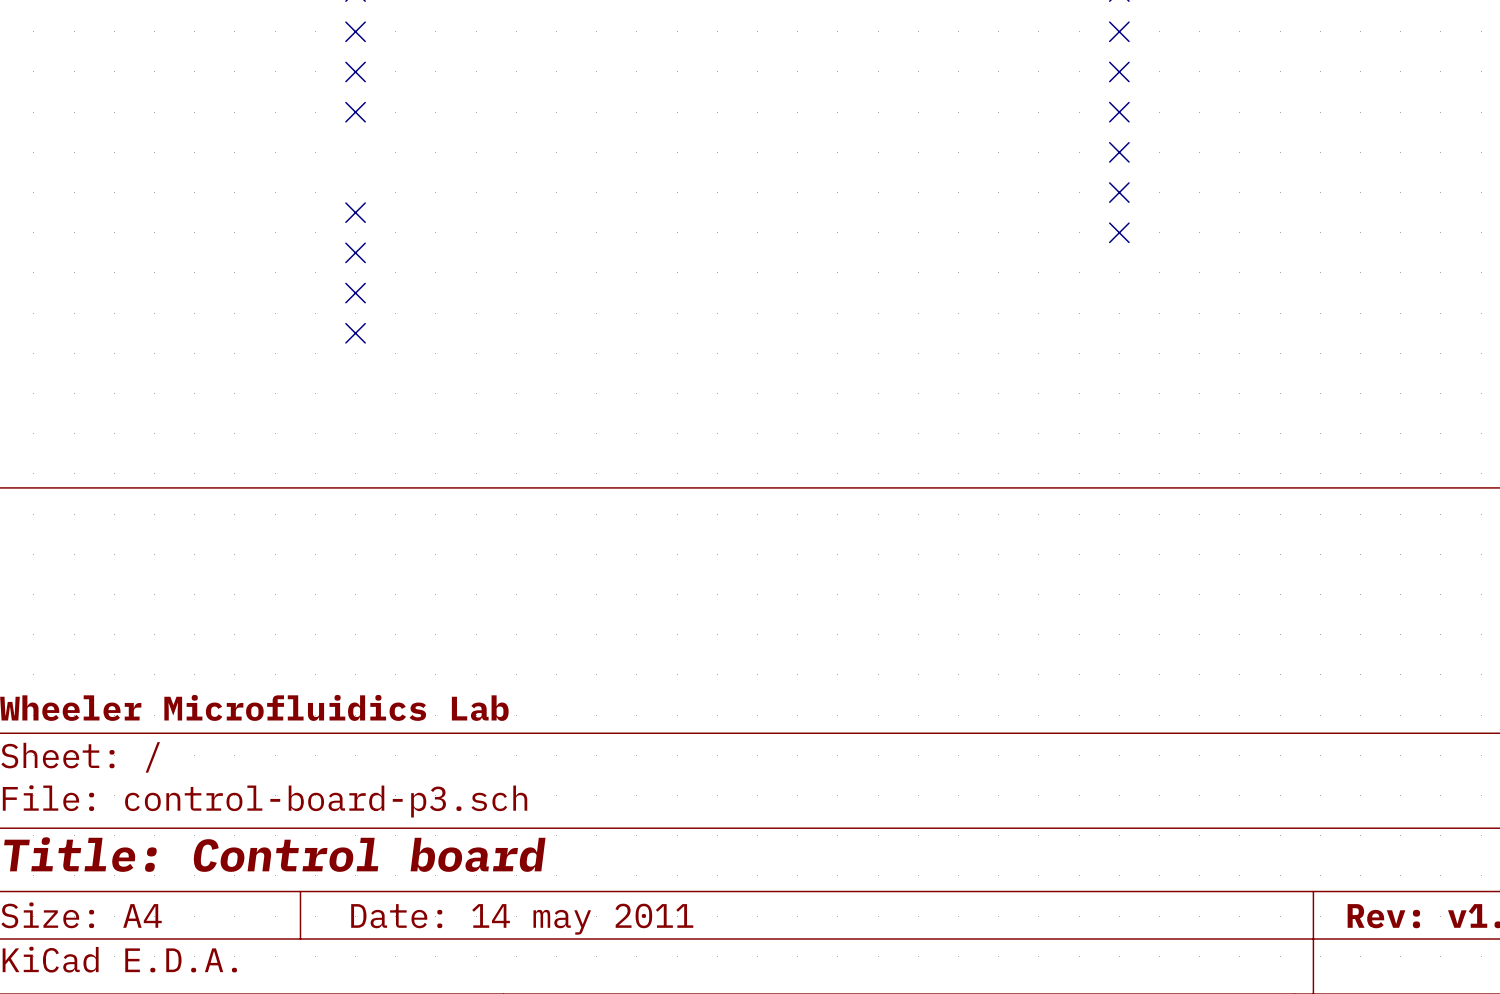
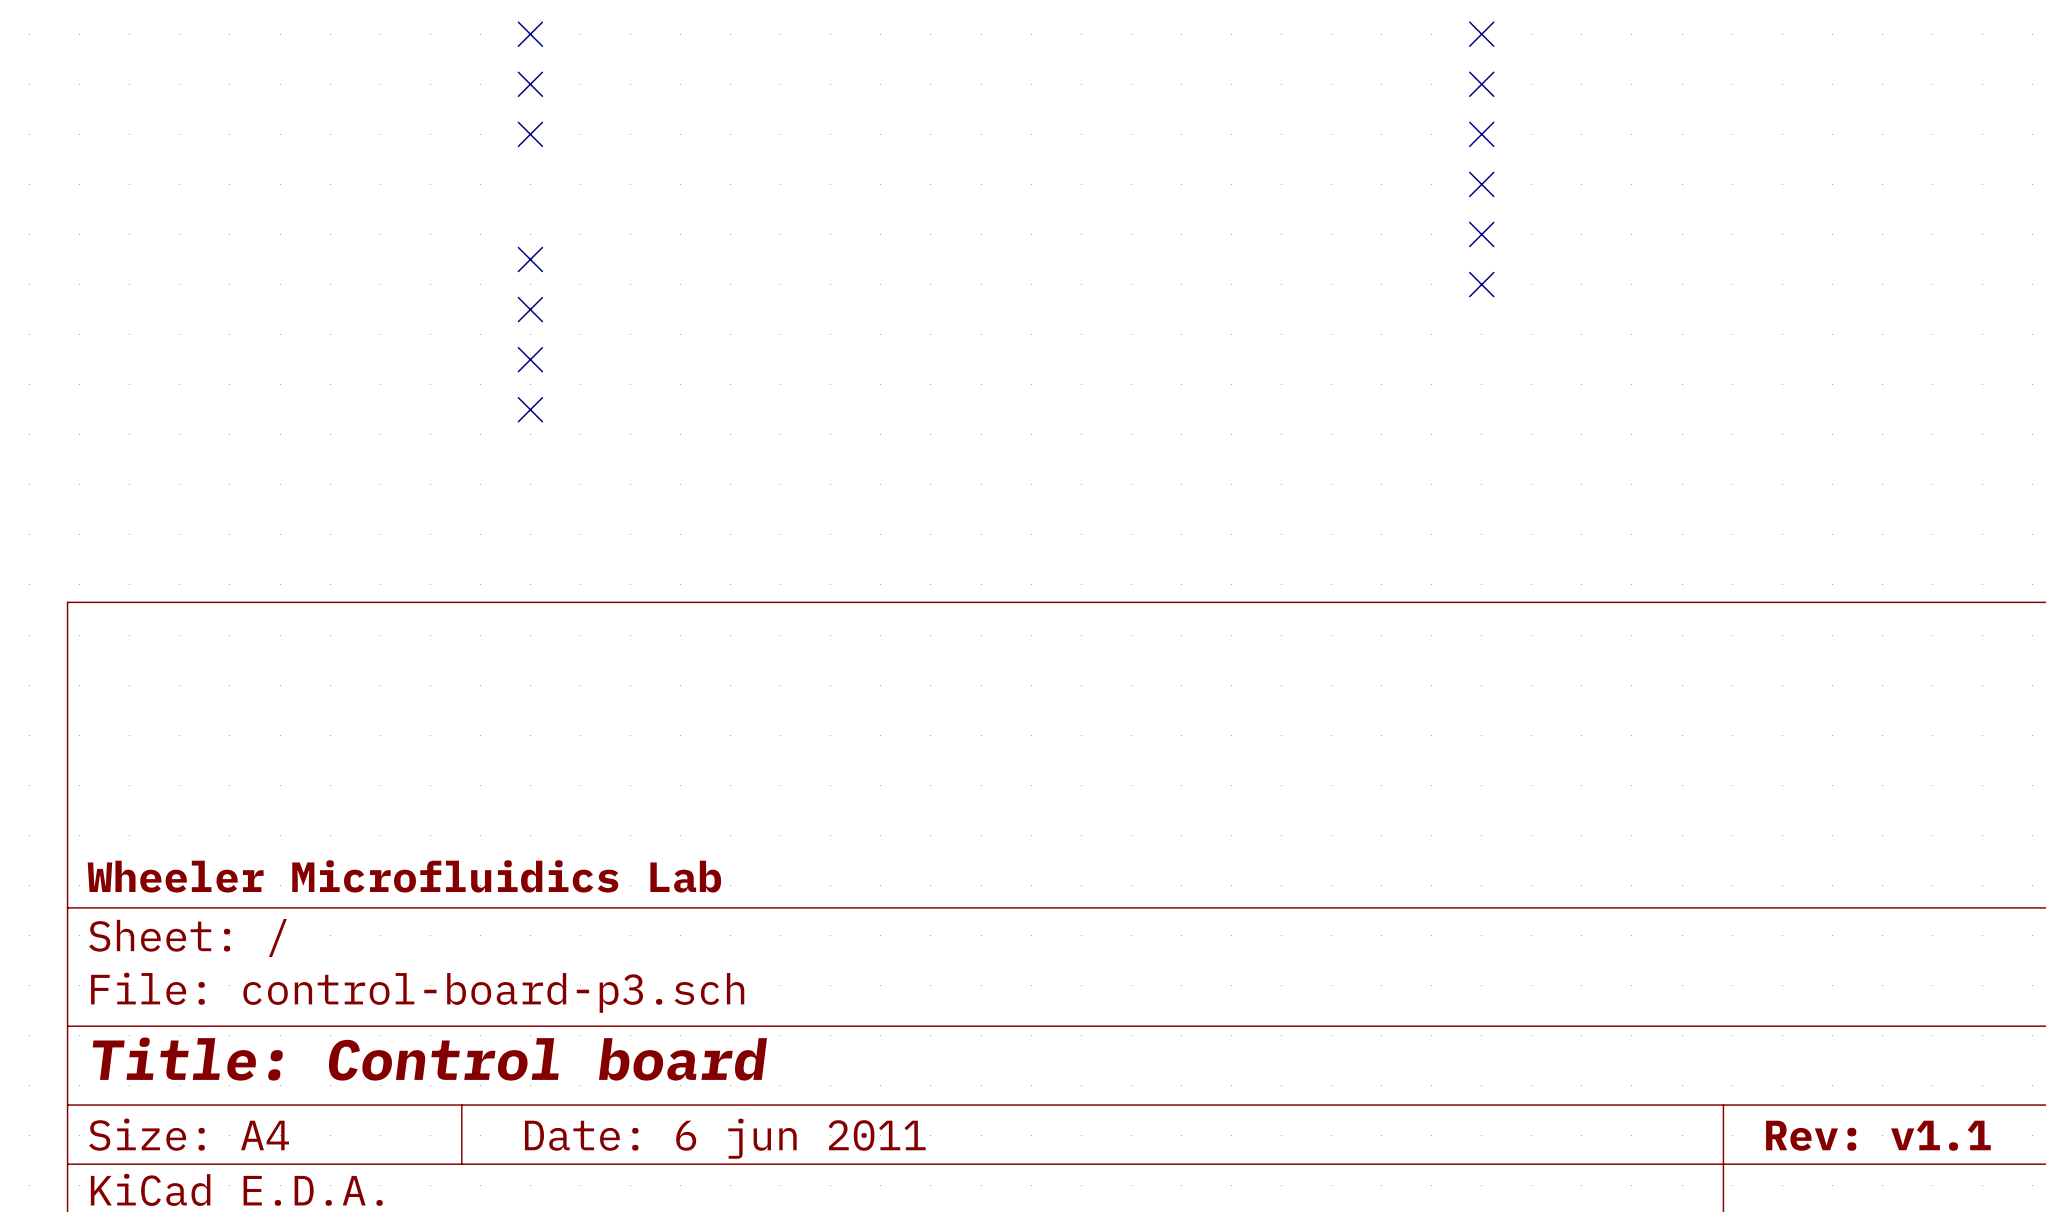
title block: Date: 14 may 2011 (522, 919) -> Date: 6 jun 2011 (725, 1138)

